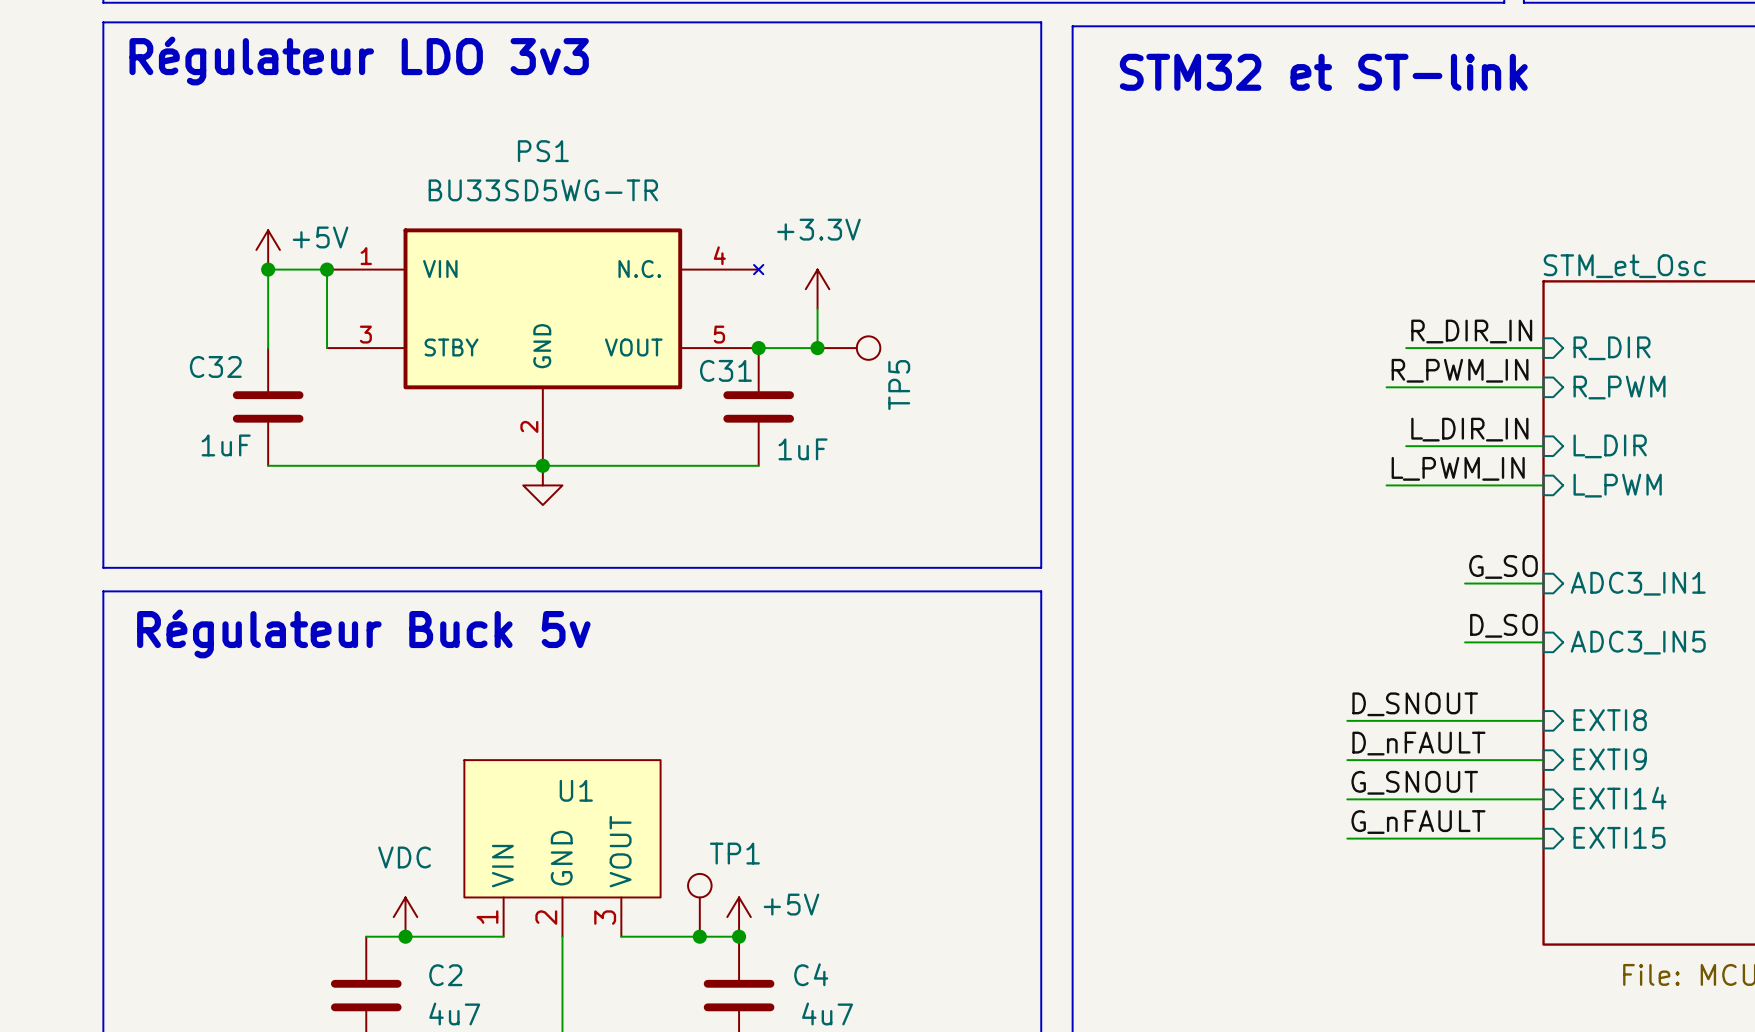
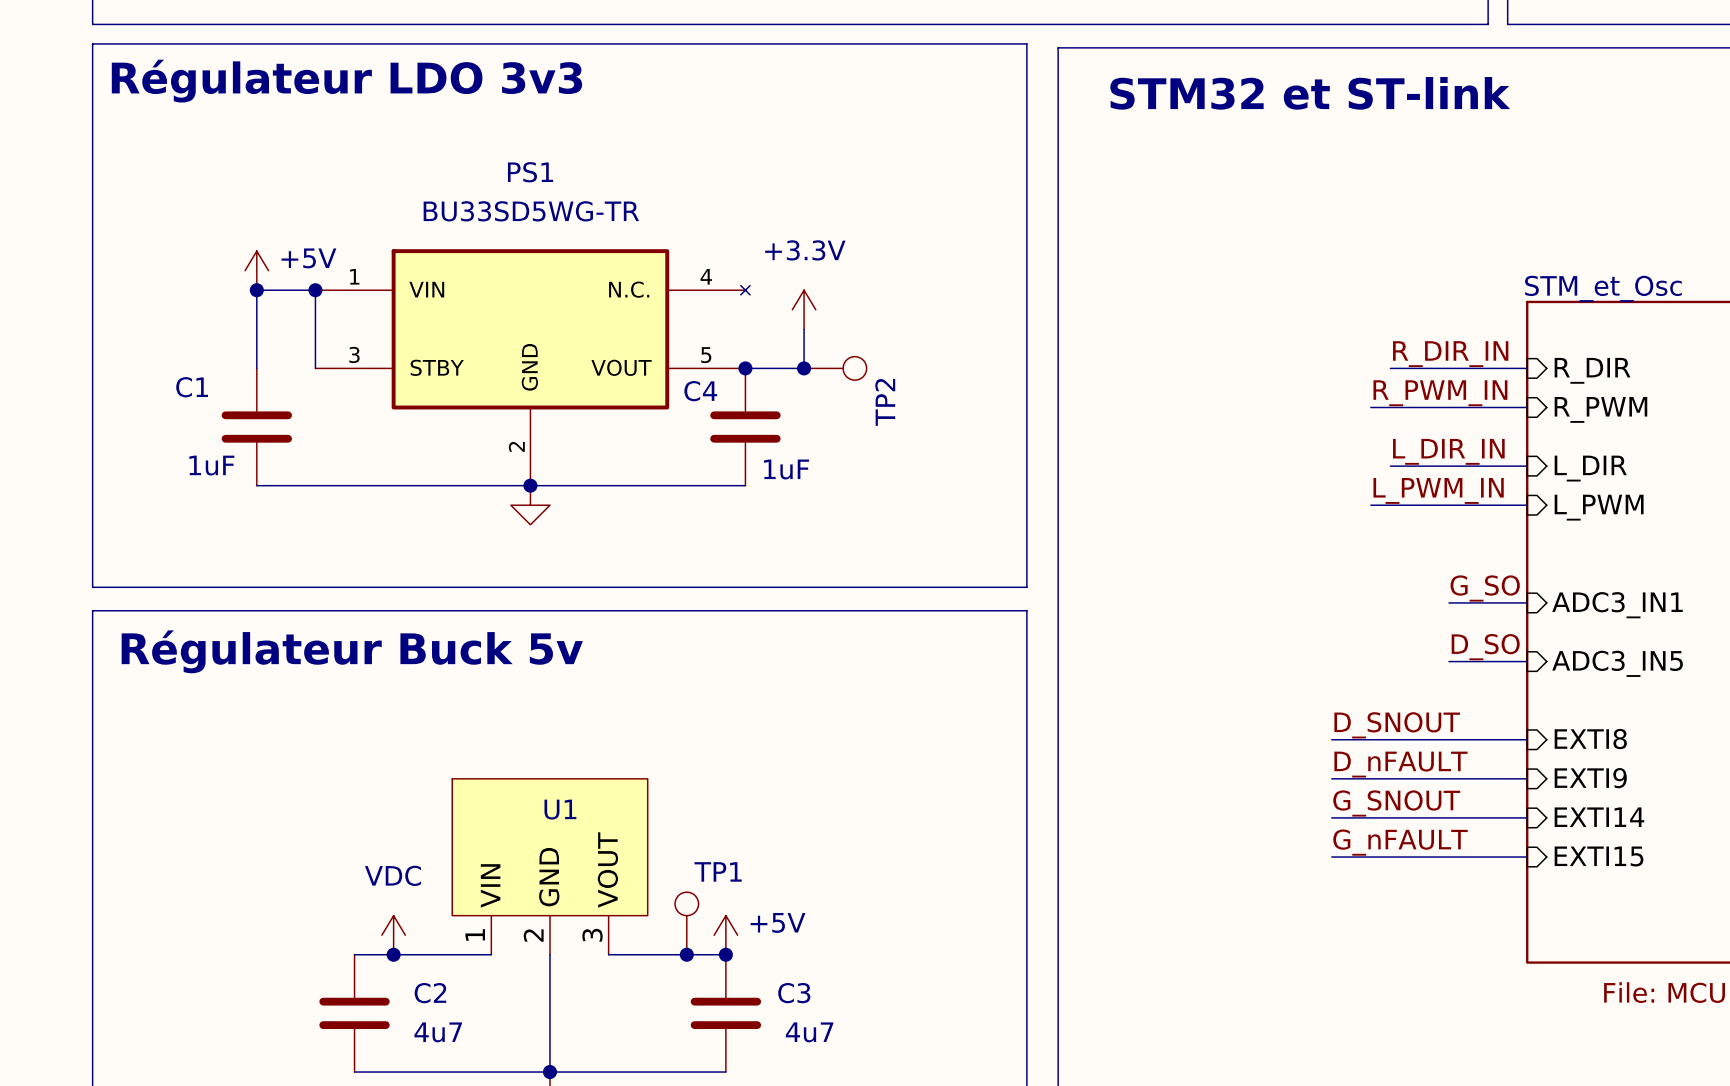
C32 name: C32 (215, 366) -> C1 (192, 387)
C31 name: C31 (725, 370) -> C4 (700, 391)
TP5 name: TP5 (899, 385) -> TP2 (885, 402)
C4 name: C4 (811, 974) -> C3 (794, 993)

